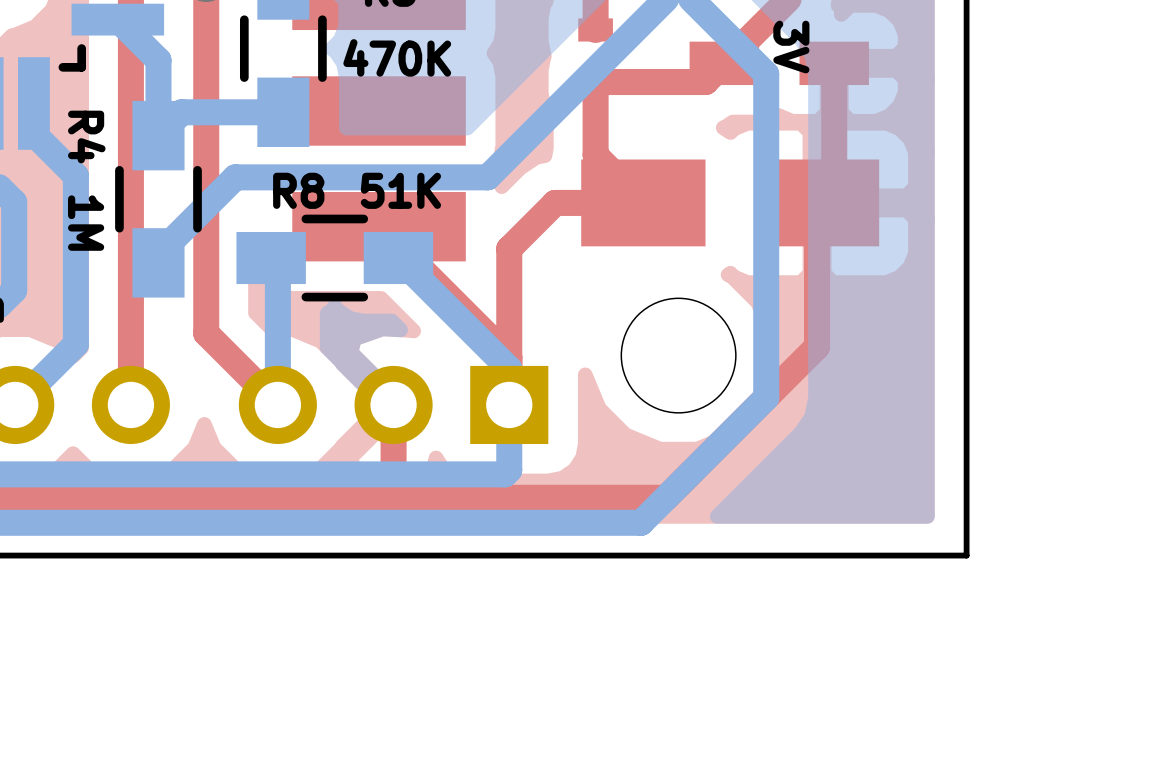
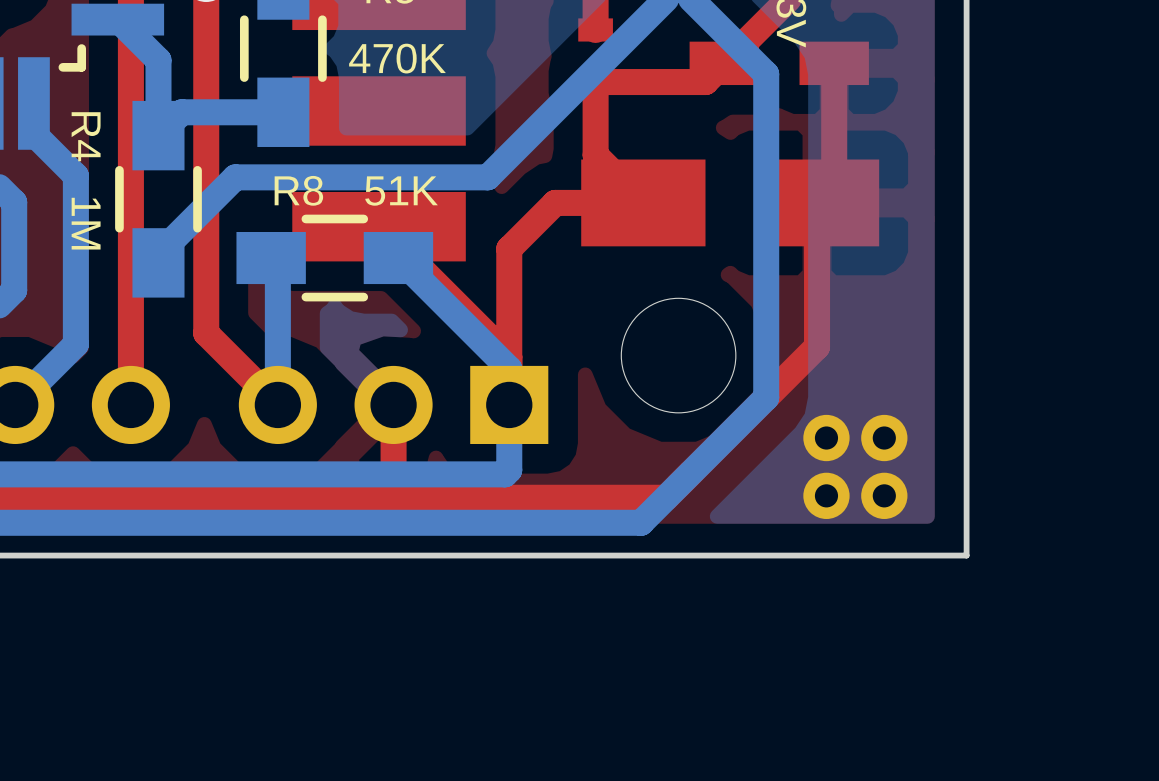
part: none -> (826, 438)
part: none -> (884, 438)
part: none -> (826, 495)
part: none -> (884, 495)

